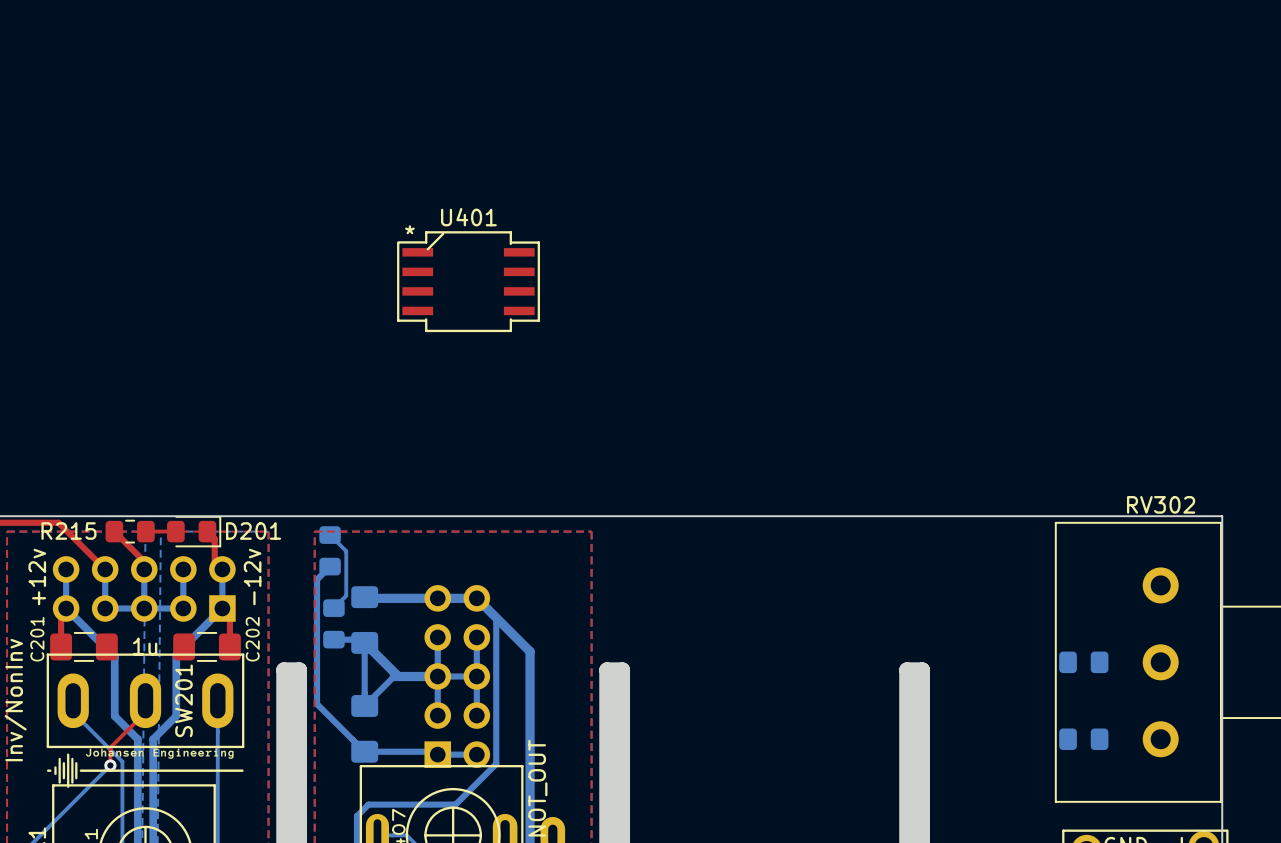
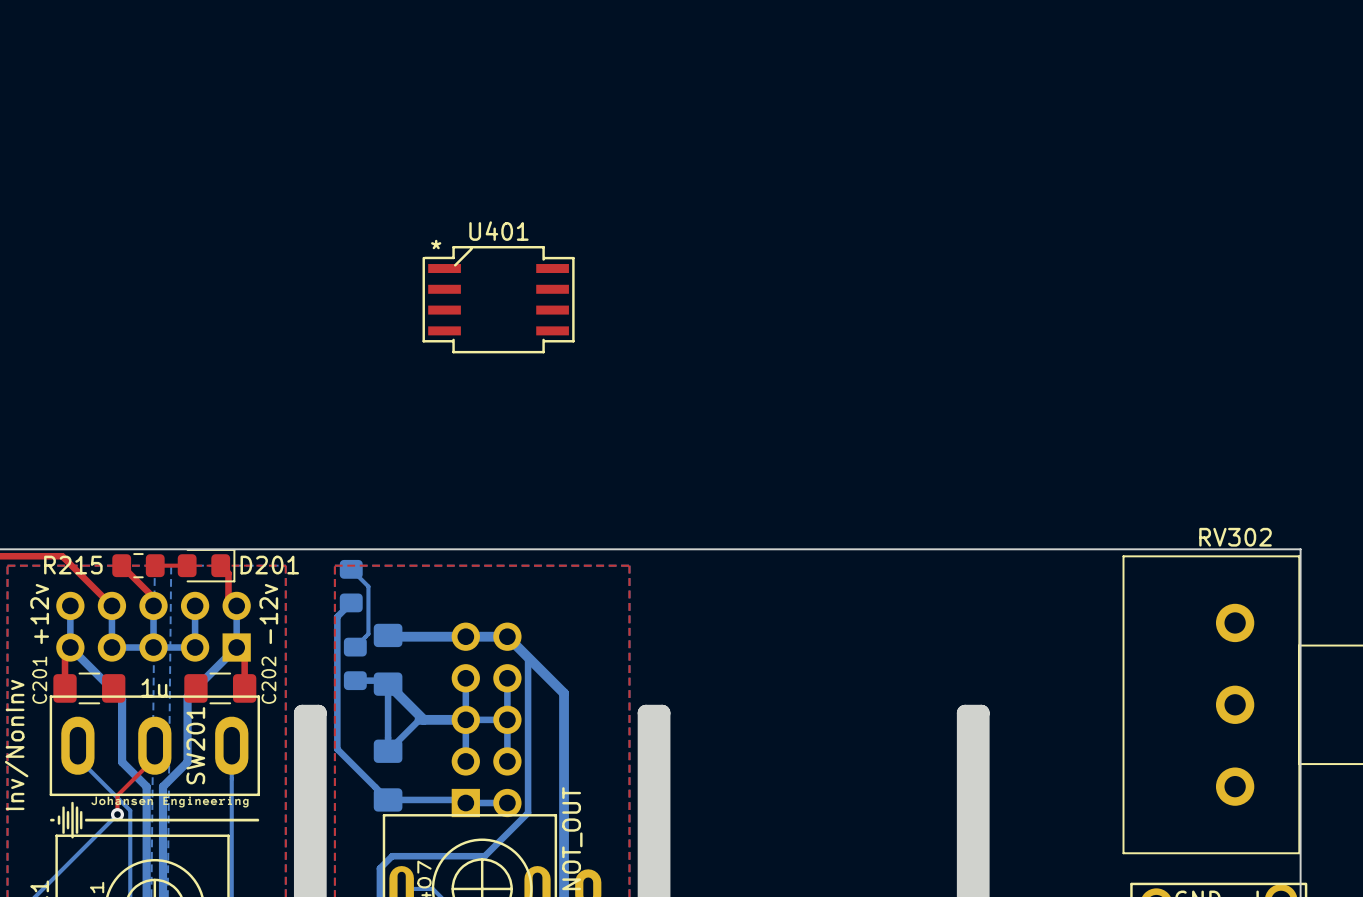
part: (1083, 662) -> none
part: (1083, 739) -> none

